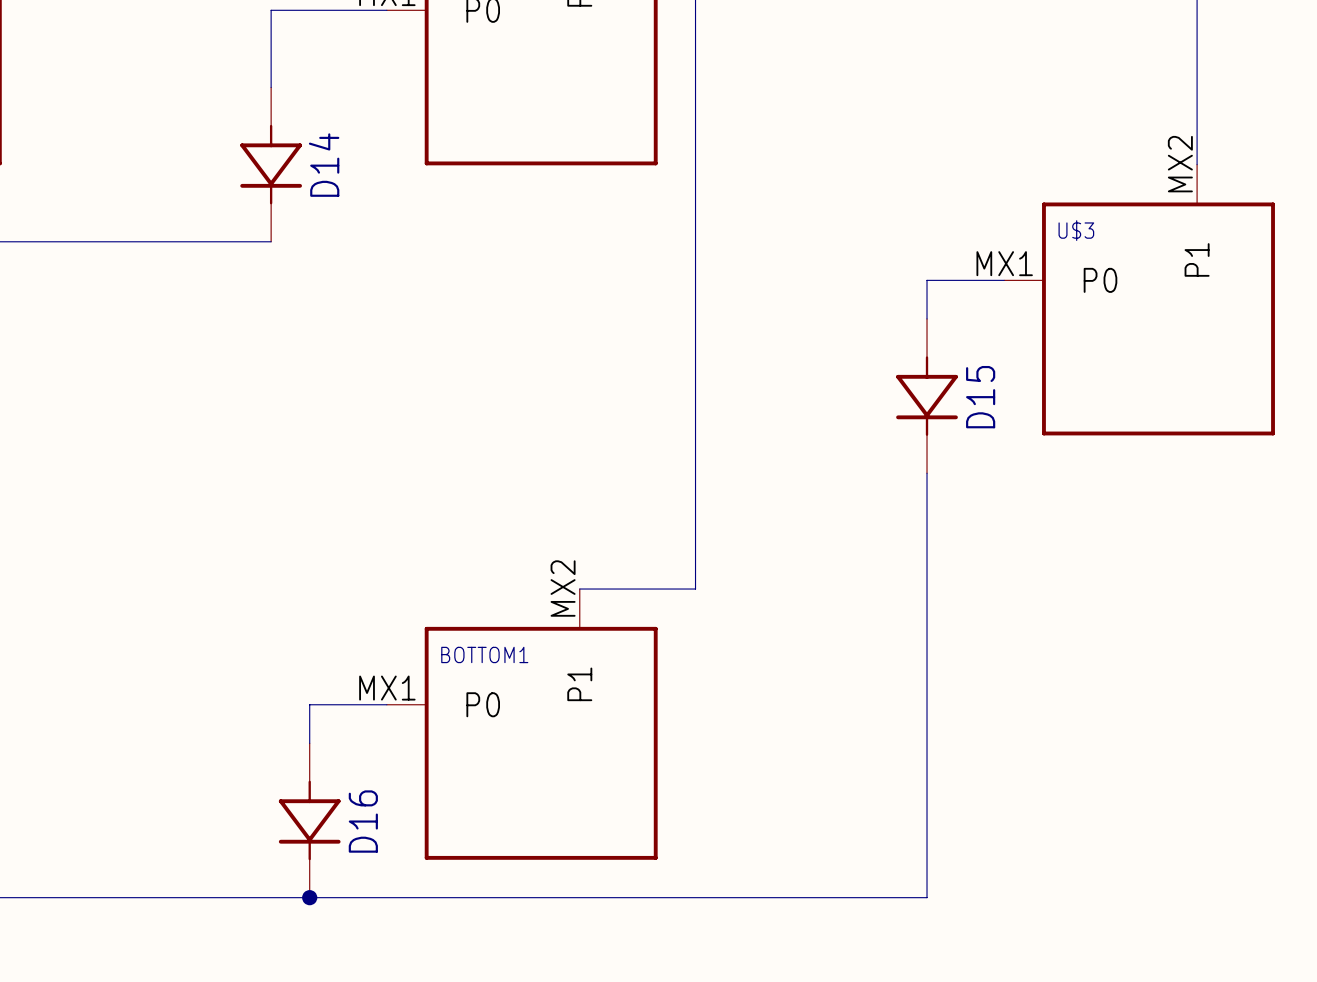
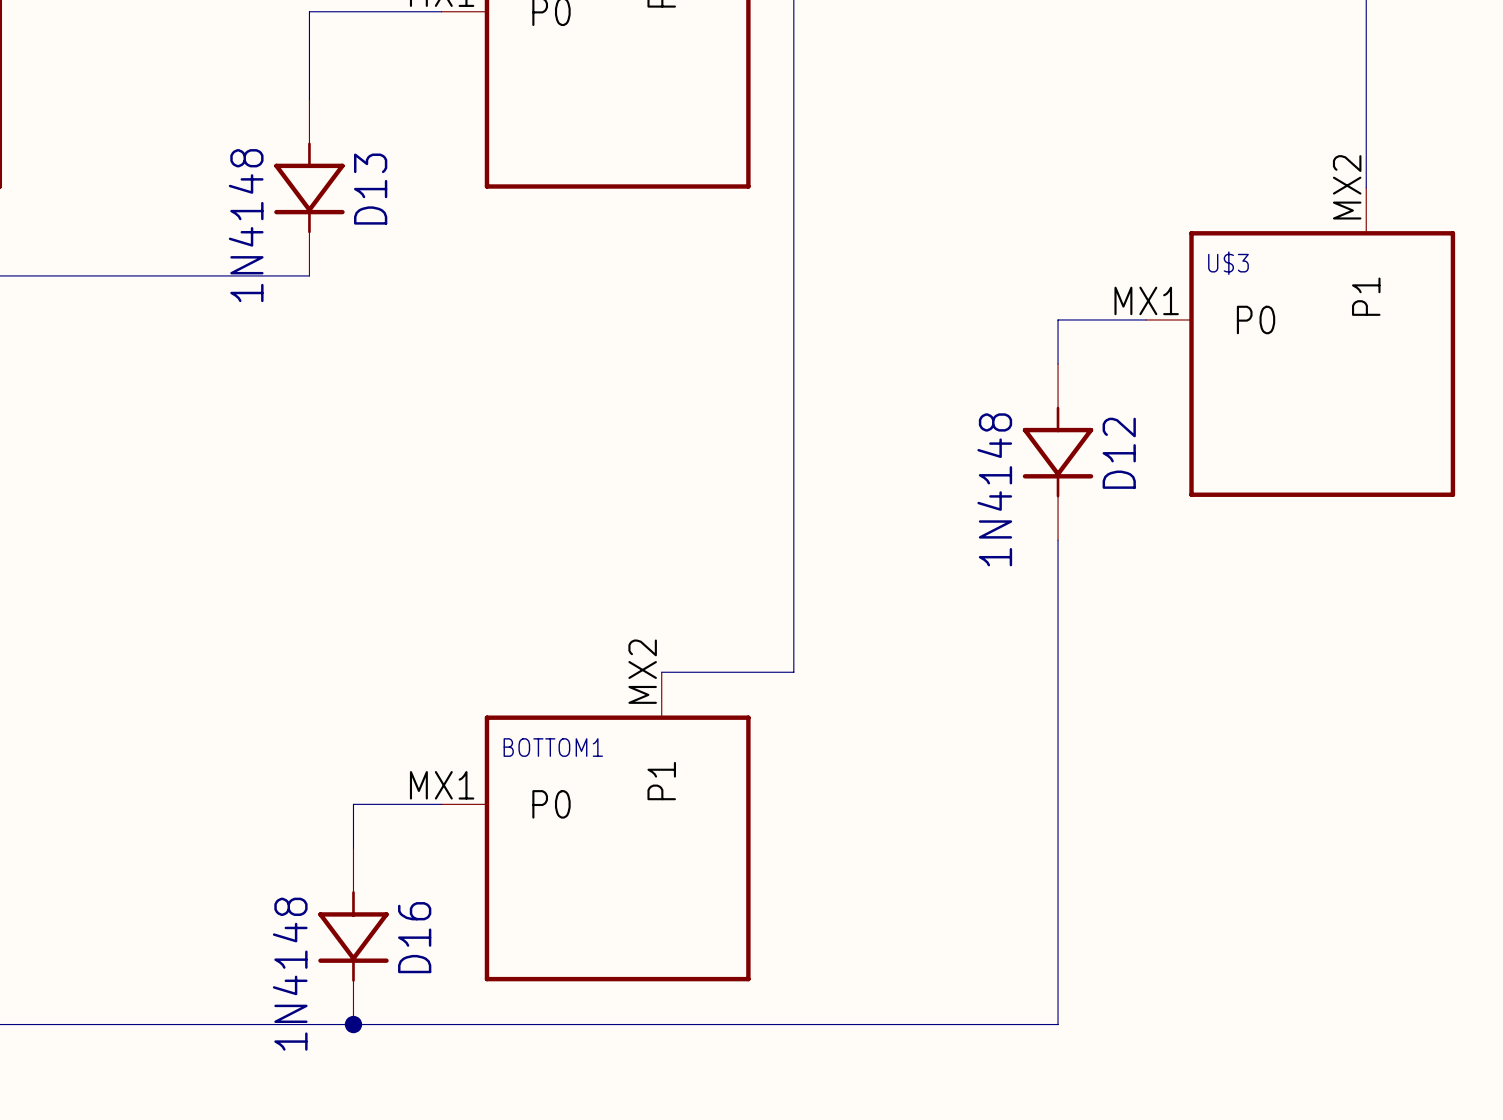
D14 name: D14 (324, 165) -> D13 (370, 189)
D14 value: none -> 1N4148 (246, 225)
D15 name: D15 (980, 397) -> D12 (1119, 453)
D15 value: none -> 1N4148 (994, 489)
D16 value: none -> 1N4148 (290, 974)

